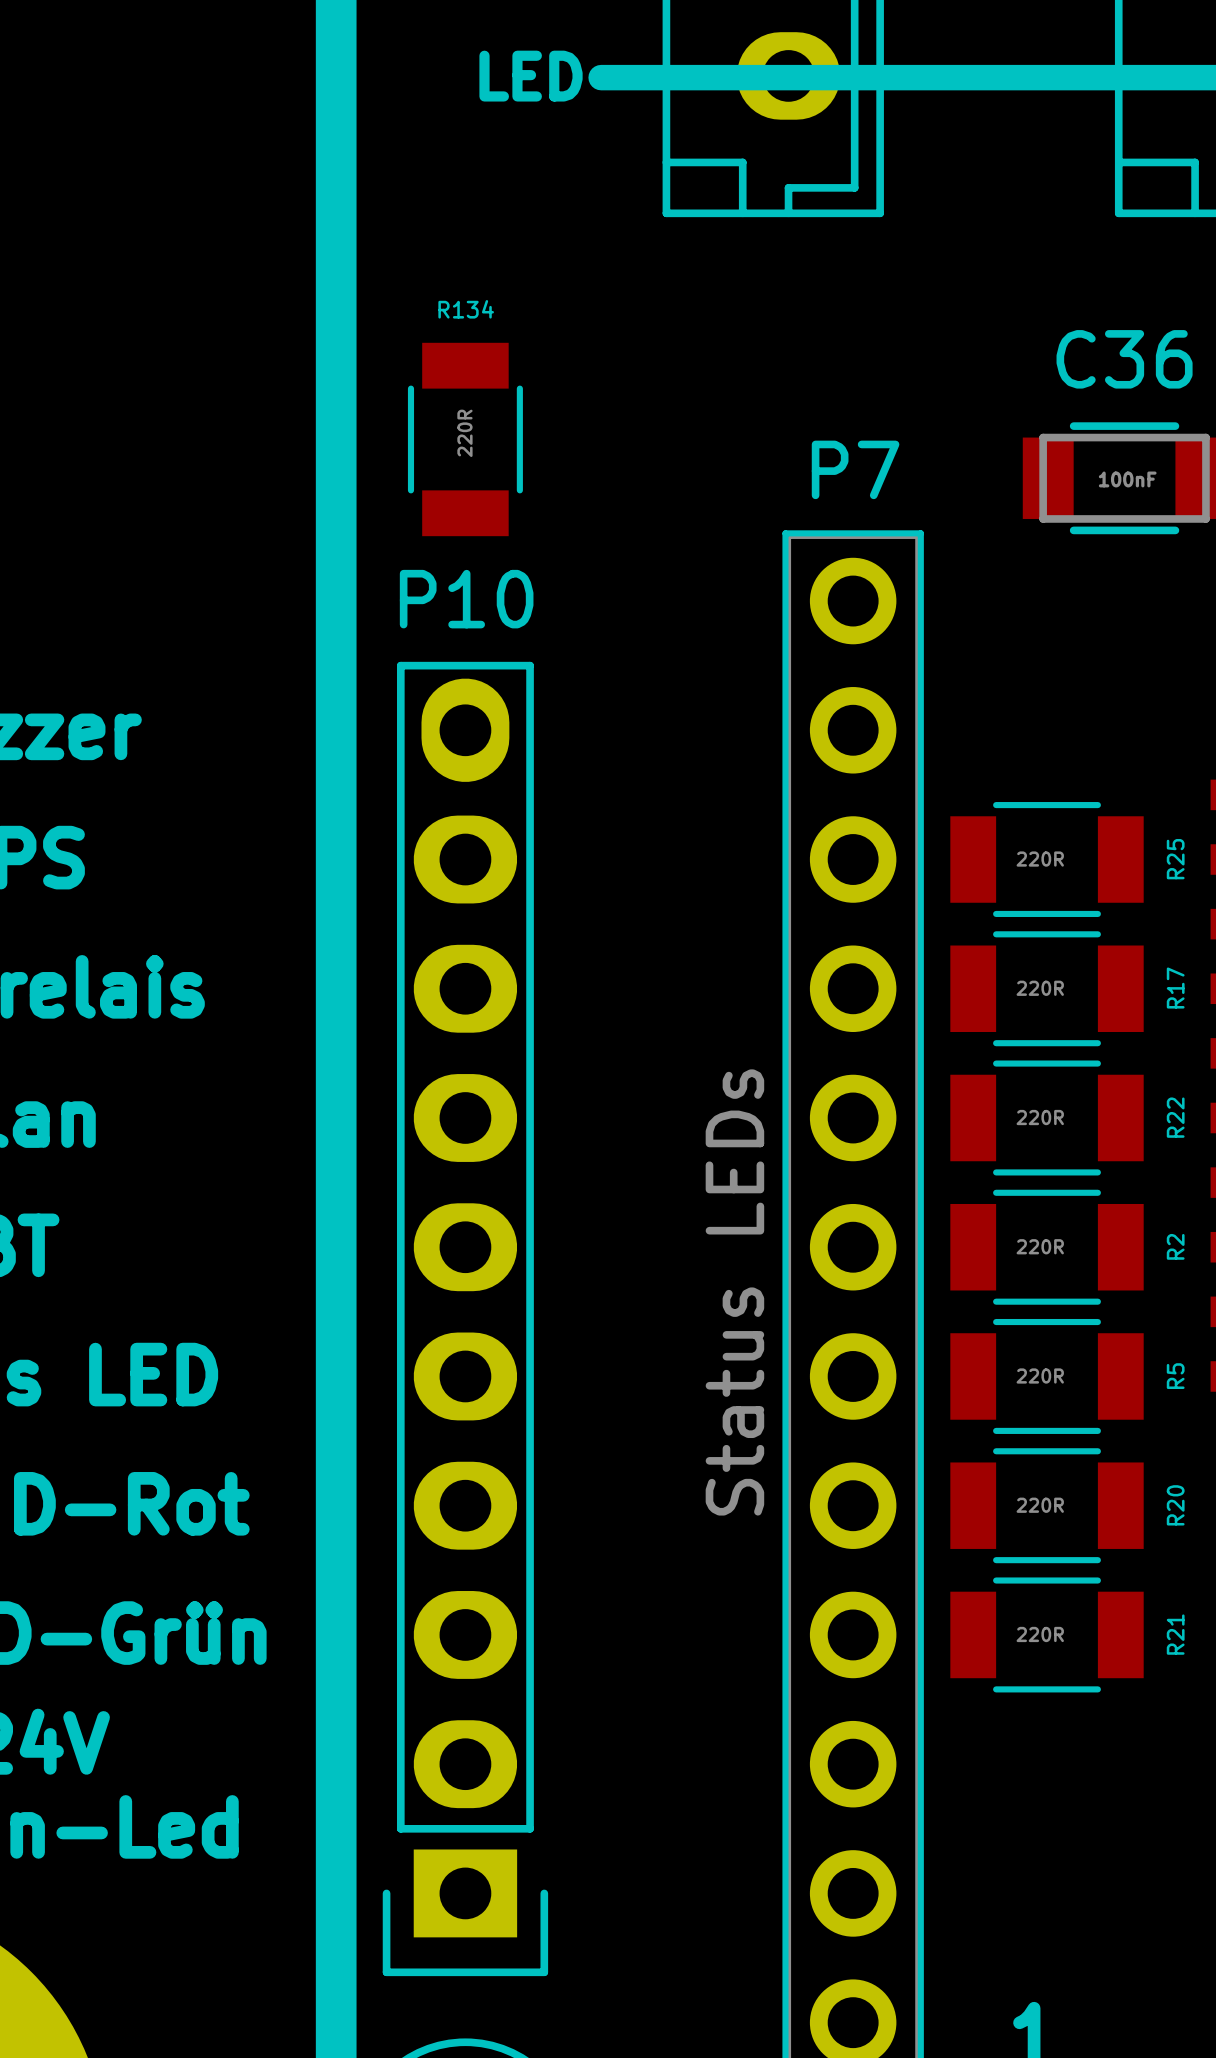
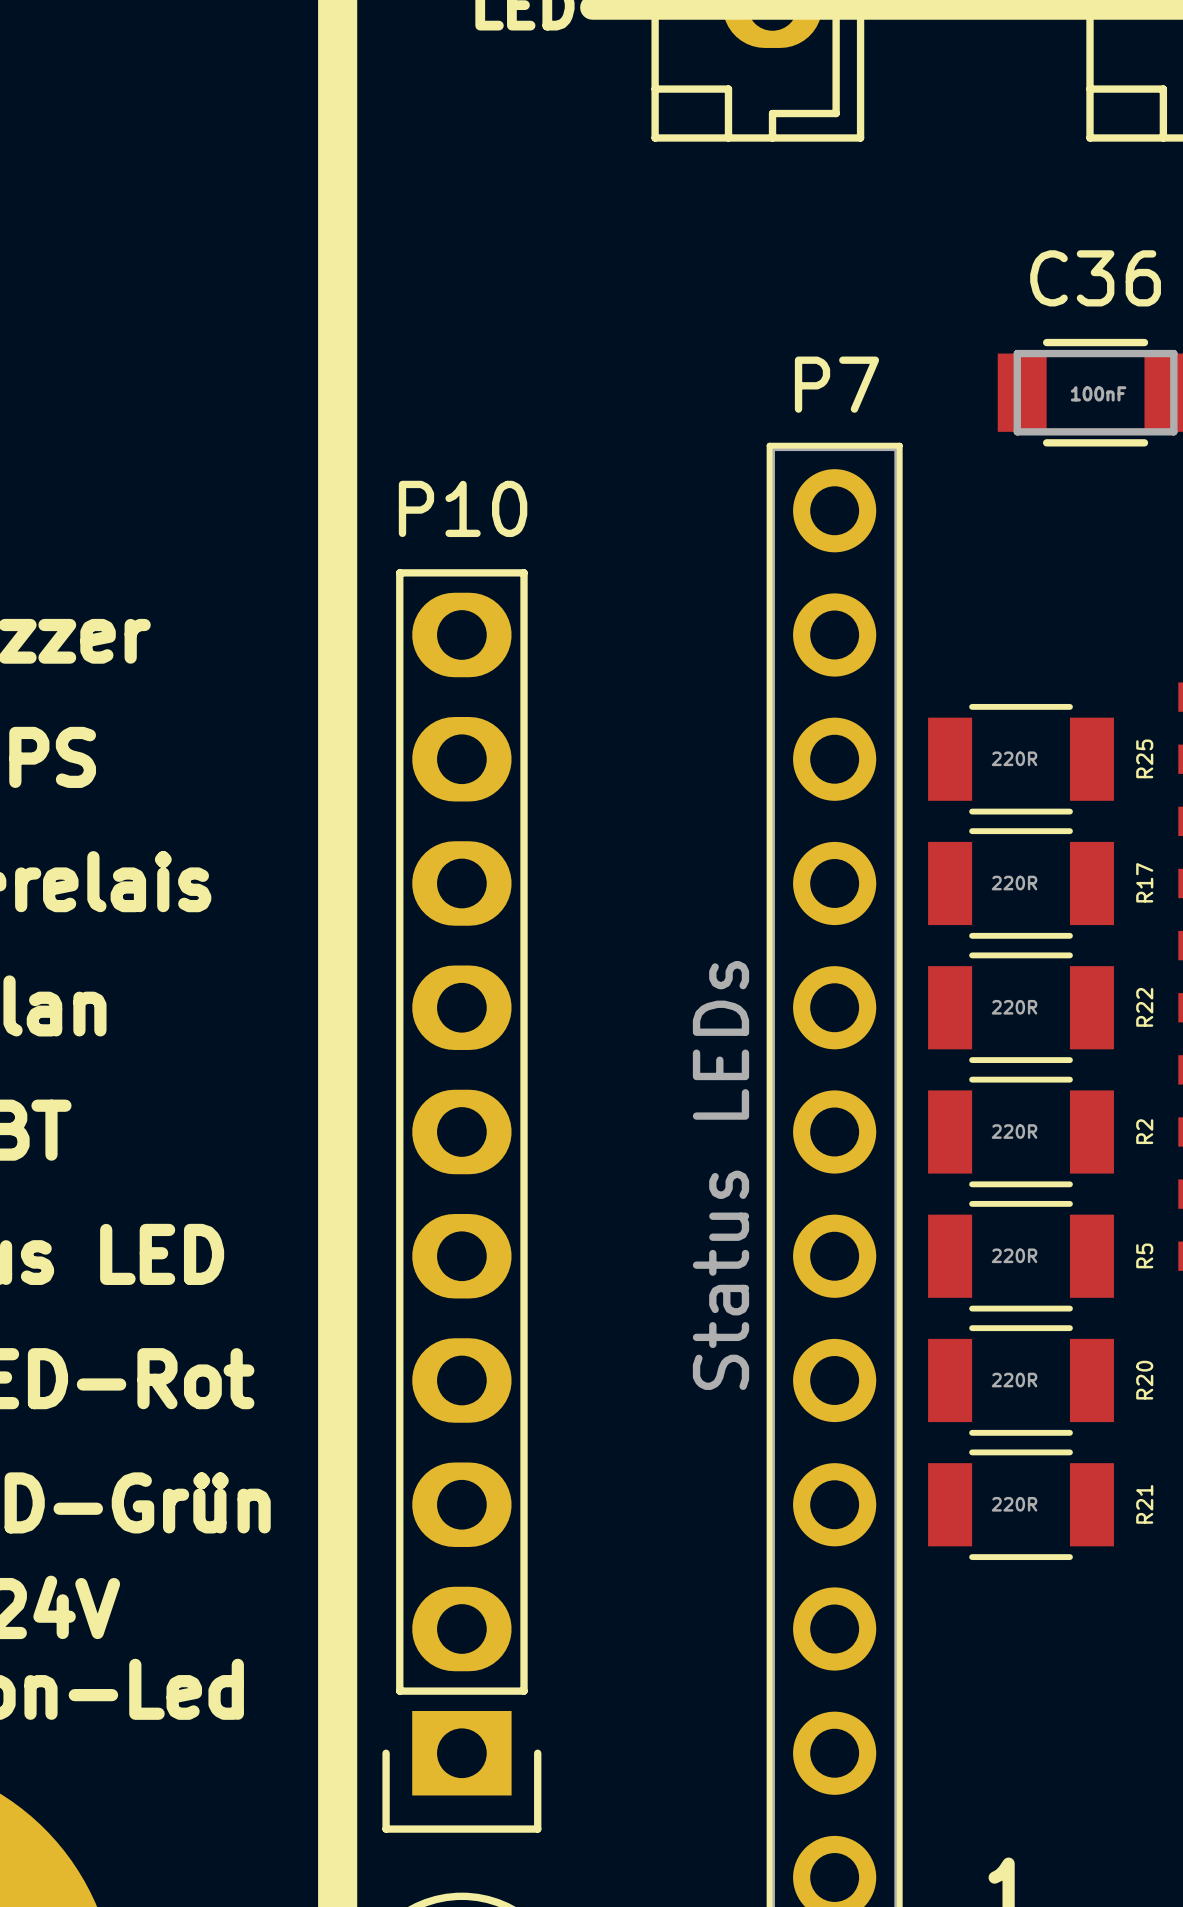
R134: 220R (465, 439) -> none
P10 footprint: [382, 661, 549, 1977] -> [382, 569, 542, 1833]

